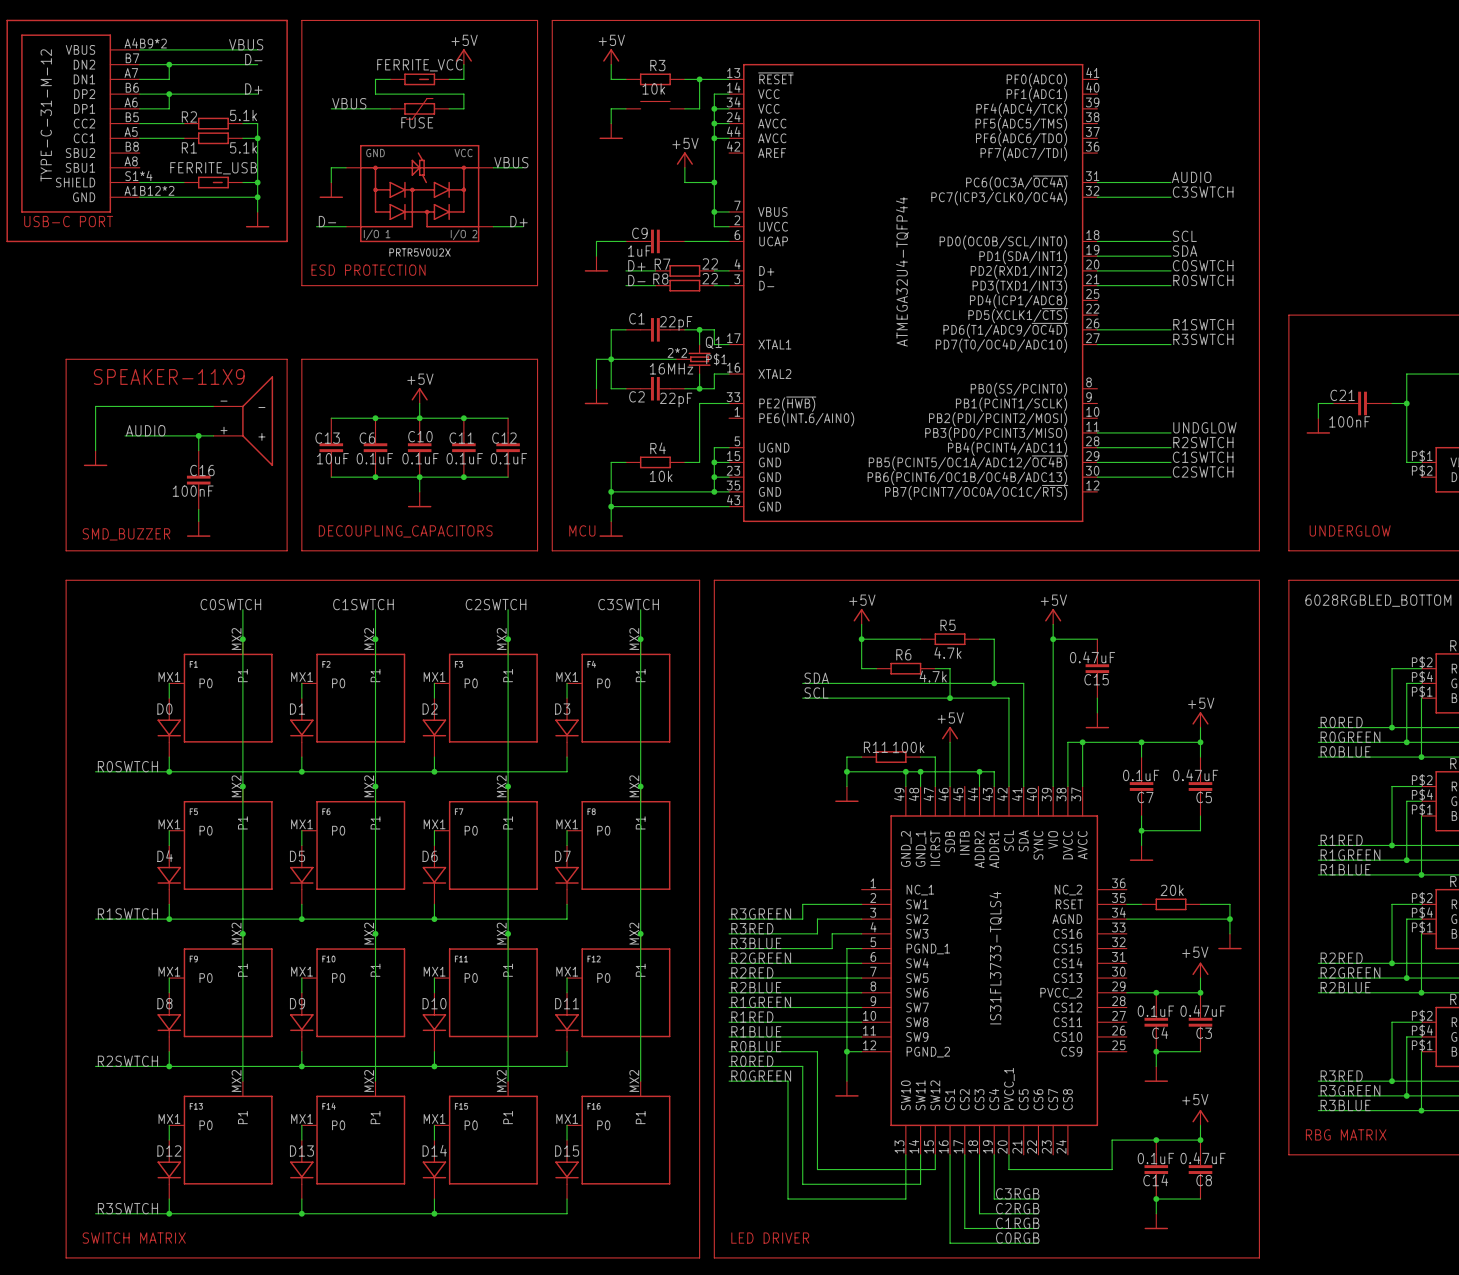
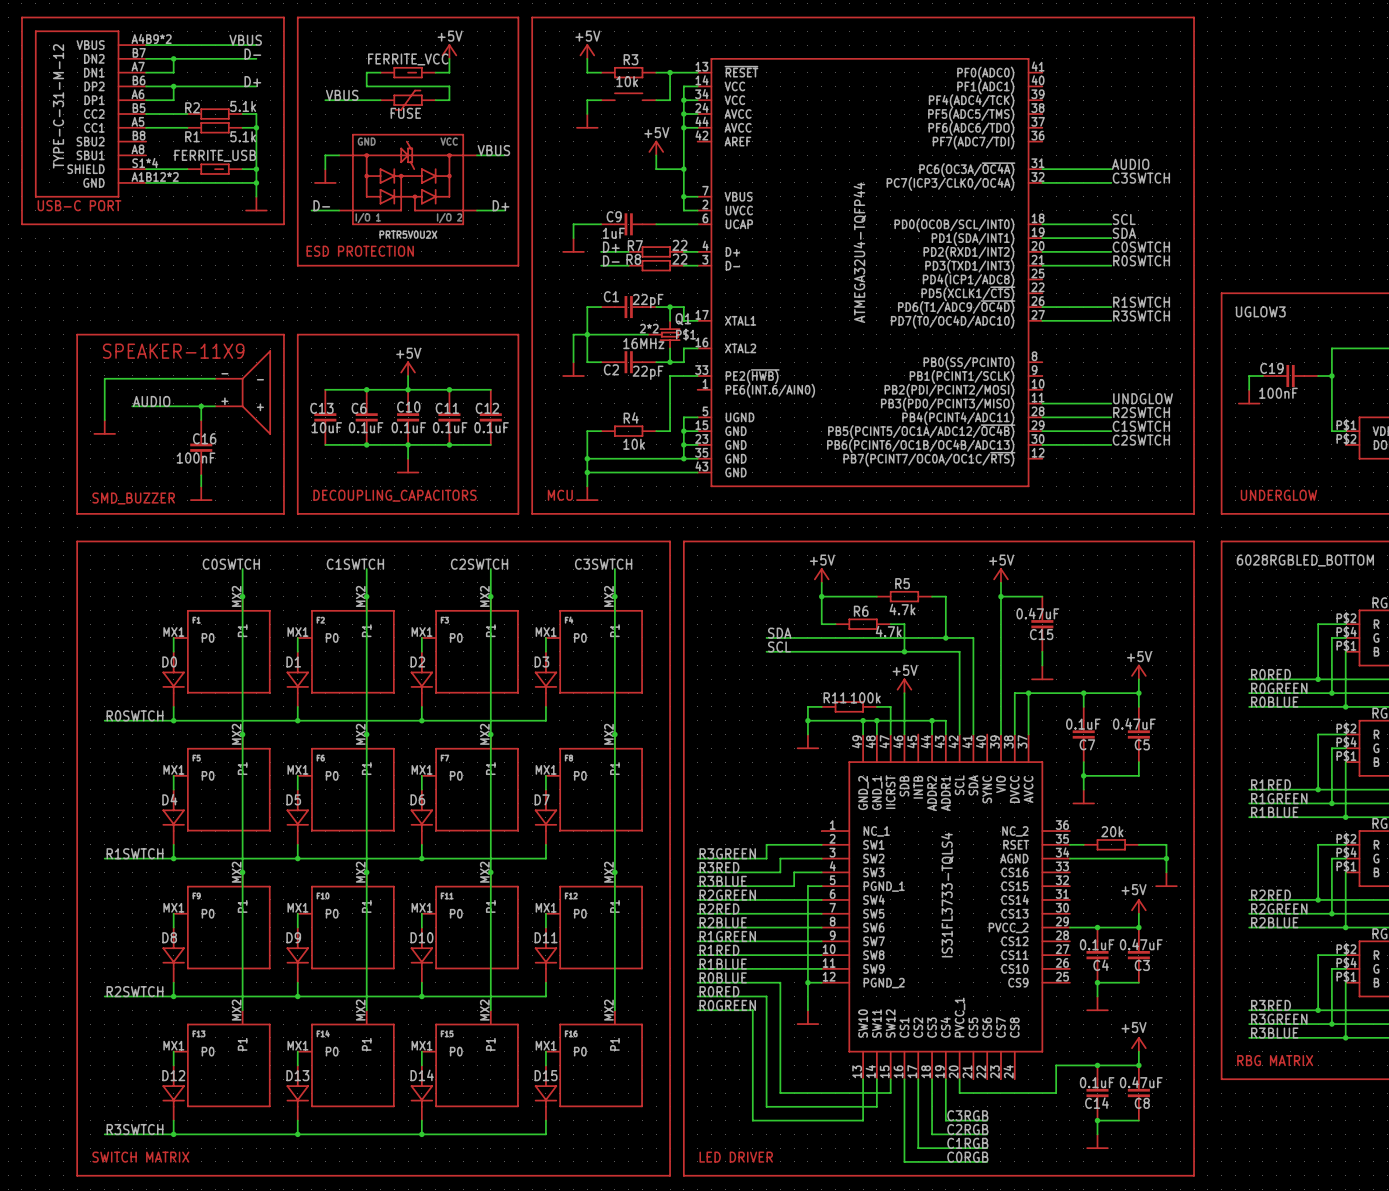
UGLOW3 name: none -> UGLOW3 (1260, 311)
C21 name: C21 (1342, 395) -> C19 (1271, 368)

